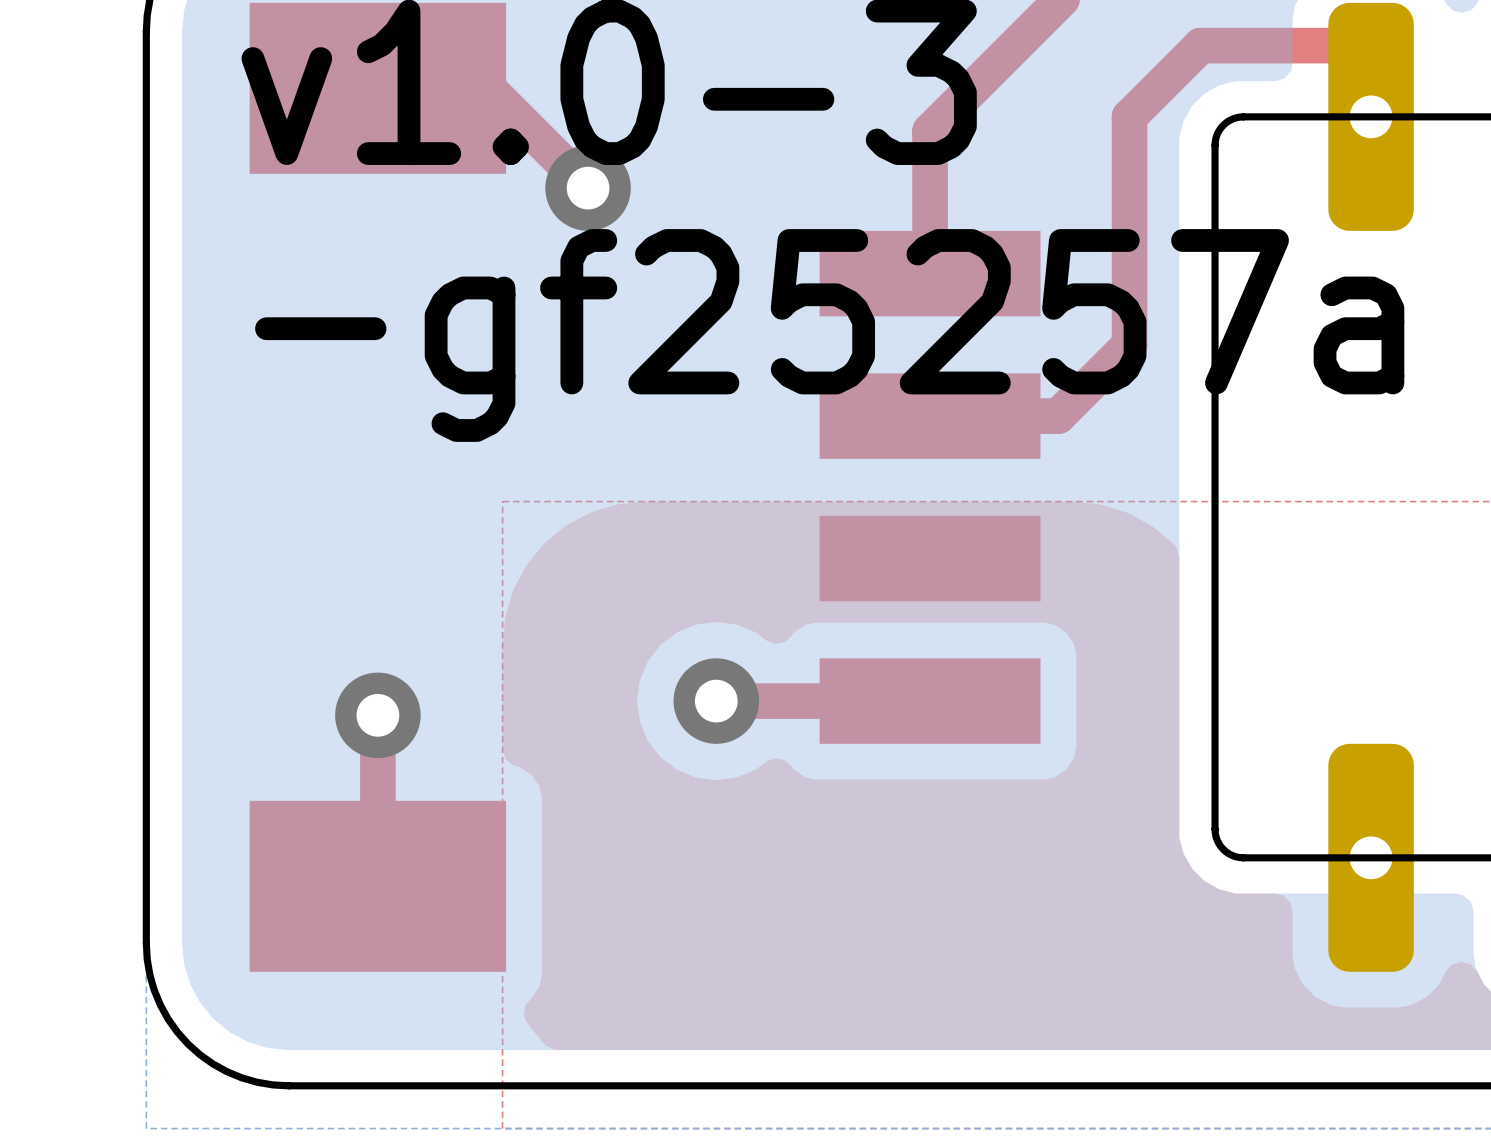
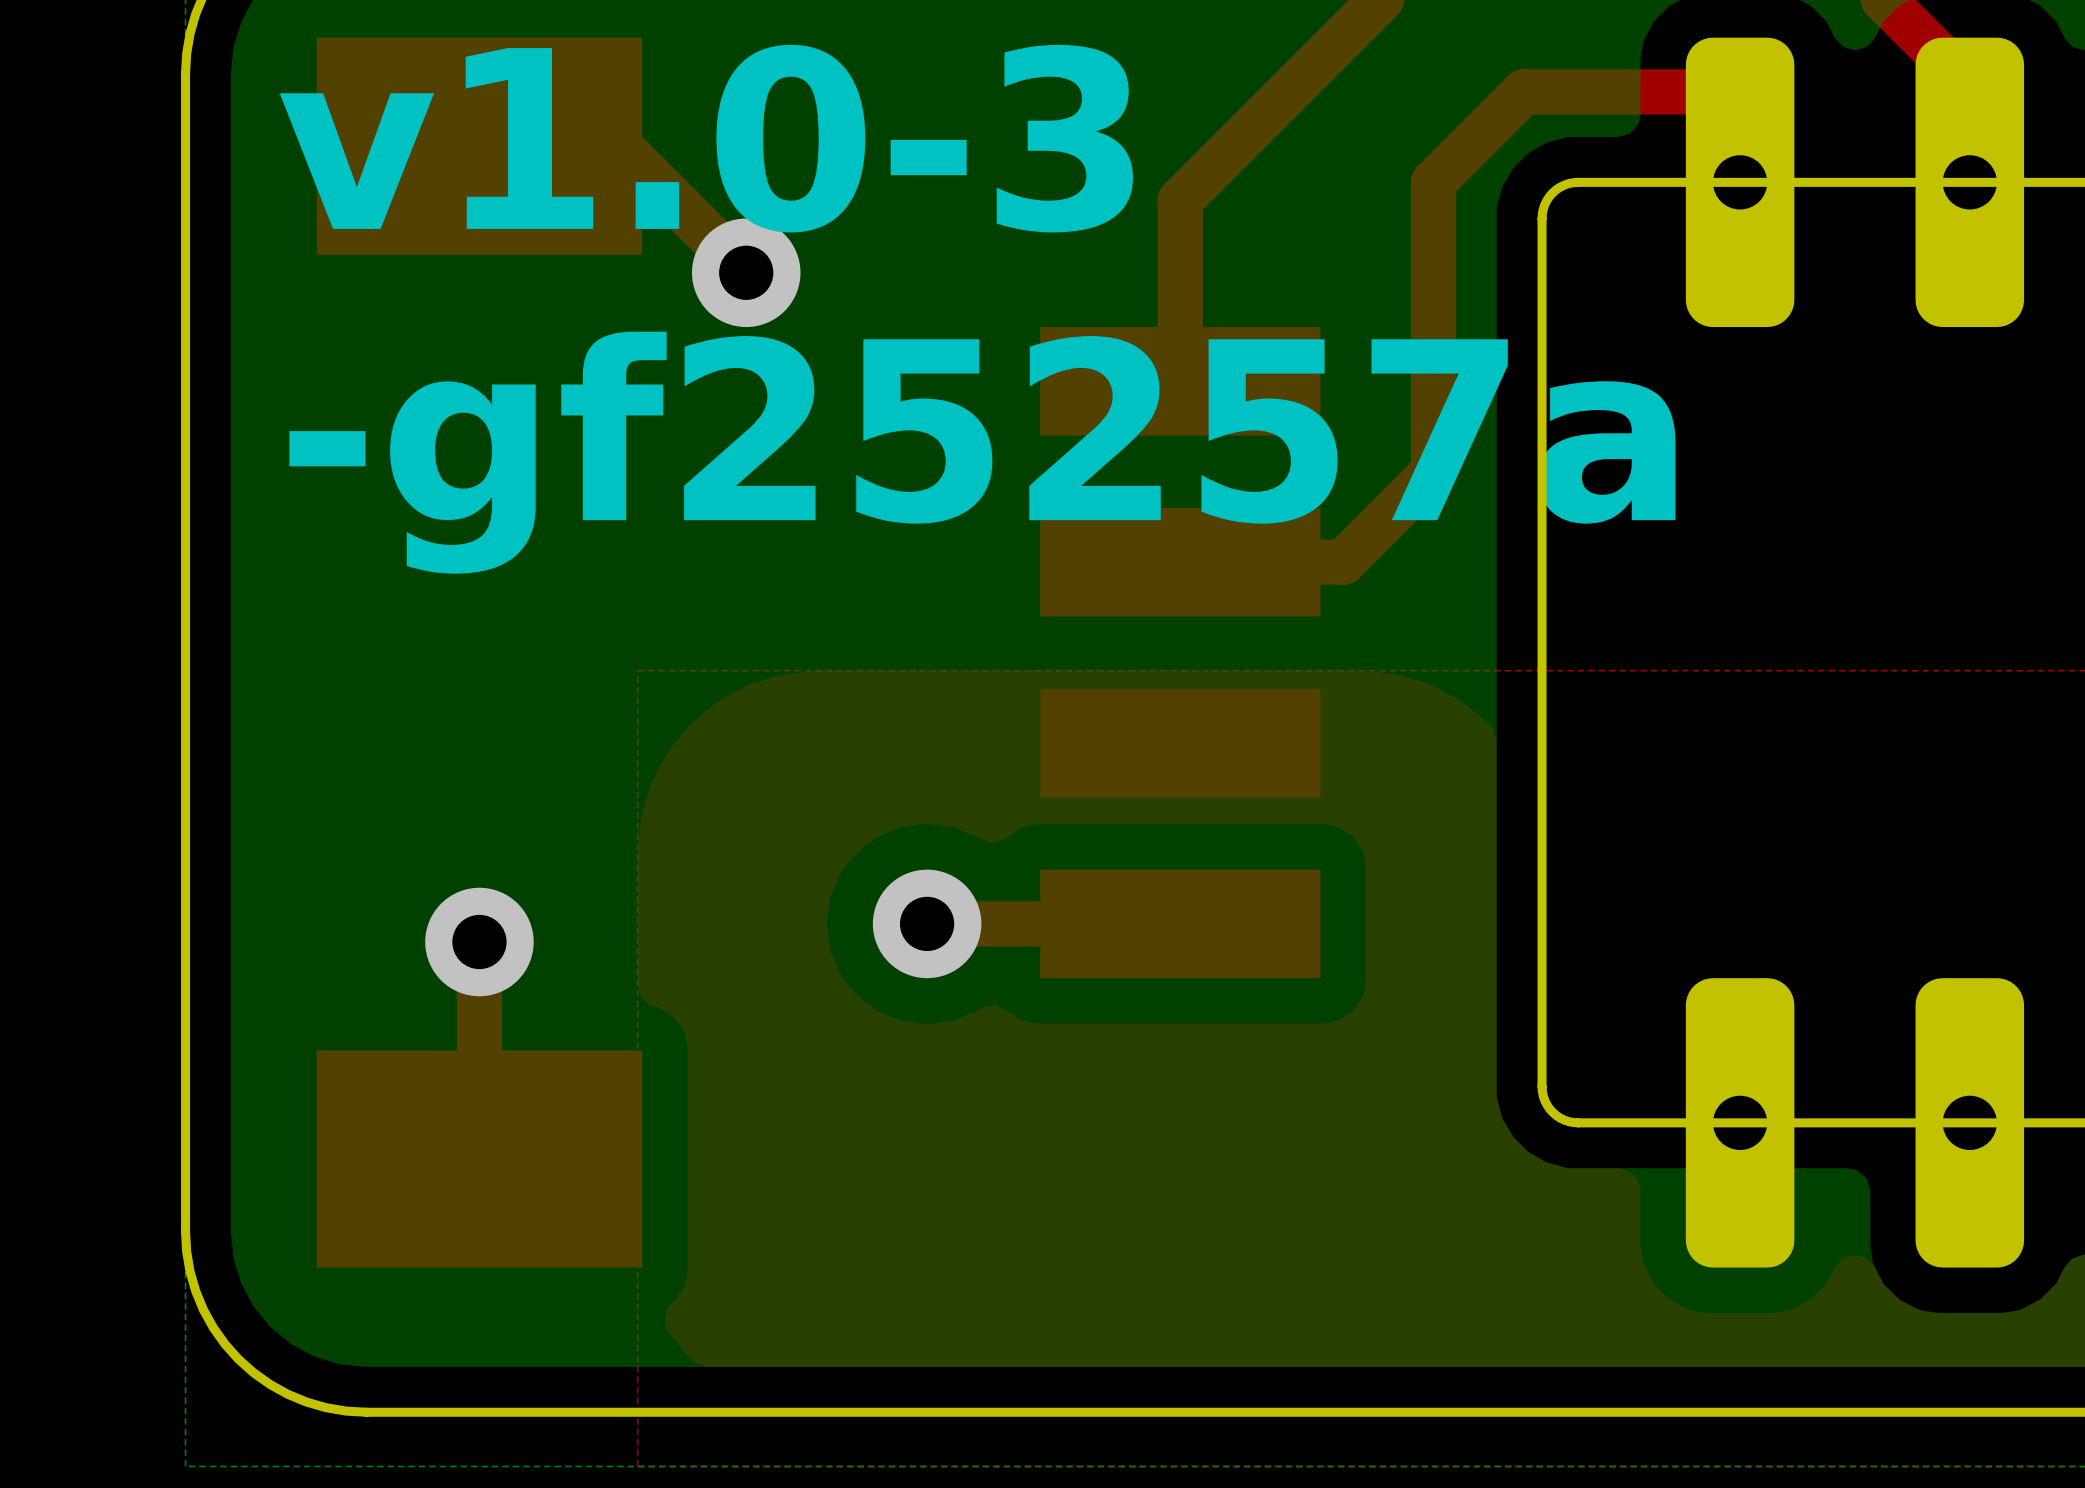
via position: (716, 701) -> (927, 923)

